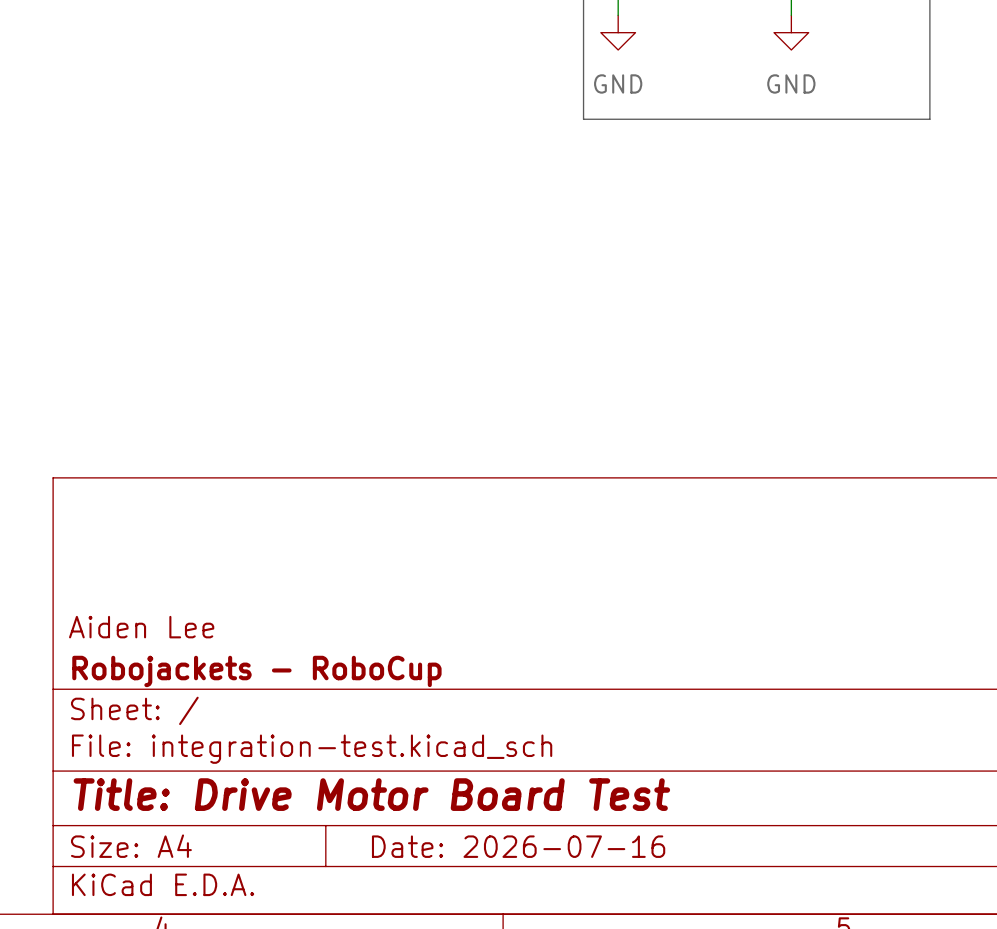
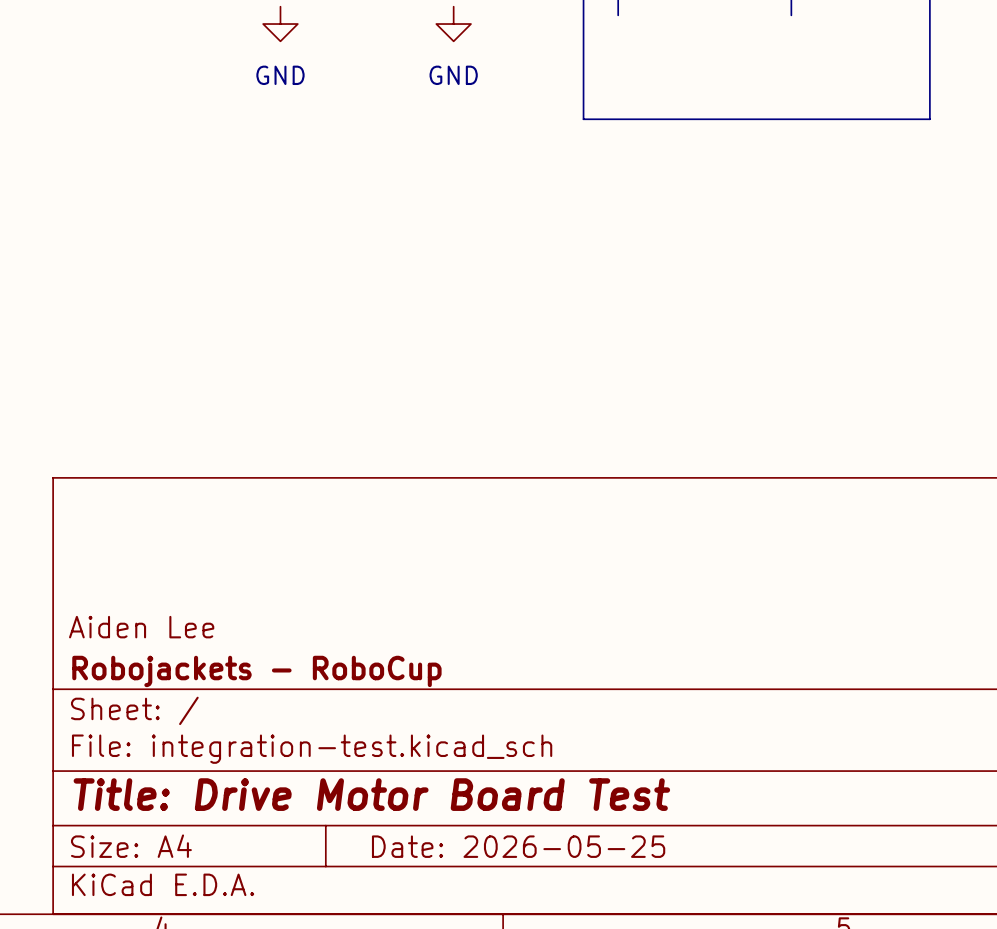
power symbol: none -> GND (280, 24)
power symbol: none -> GND (453, 24)
power symbol: GND (618, 32) -> none
power symbol: GND (791, 32) -> none
title block: Date: 2026-07-16 (518, 846) -> Date: 2026-05-25 (518, 846)

